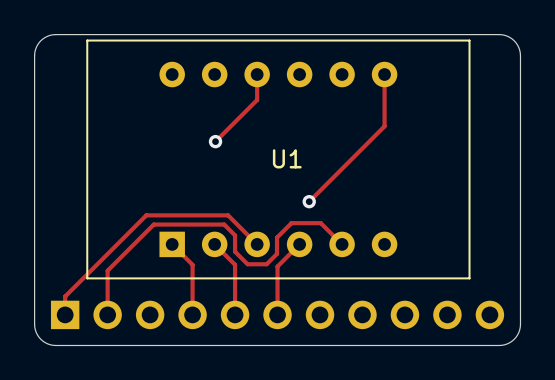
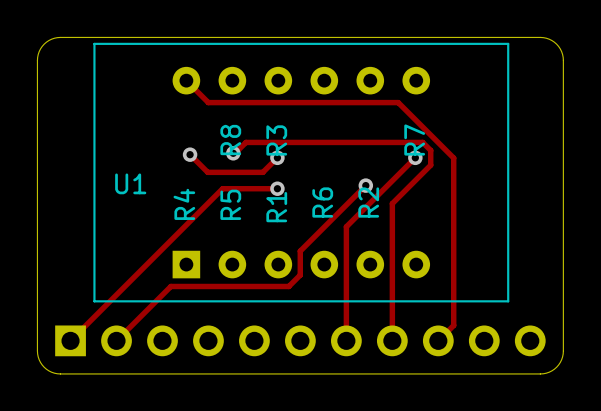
track: none -> (186, 80) (208, 102) (398, 102) (453, 158) (453, 325) (438, 340)
track: (257, 74) (257, 100) (215, 141) -> none
track: (384, 74) (384, 126) (309, 201) -> none
R8: none -> (230, 140)
R3: none -> (276, 140)
R7: none -> (414, 140)
track: none -> (190, 154) (207, 172) (262, 172) (277, 157)
via: none -> (190, 154)
track: none -> (231, 156) (245, 142) (422, 142) (430, 150) (430, 165) (392, 203) (392, 340)
via: none -> (277, 157)
track: none -> (415, 157) (346, 226) (346, 340)
via: none -> (415, 157)
U1 name position: U1 (287, 158) -> U1 (130, 183)
via: none -> (365, 185)
via: none -> (277, 188)
R6: none -> (322, 202)
R2: none -> (368, 202)
R4: none -> (184, 204)
R5: none -> (230, 204)
R1: none -> (276, 207)
via: (309, 201) -> none
track: (172, 244) (192, 264) (192, 314) -> none
track: (214, 244) (235, 264) (235, 314) -> none
track: (257, 244) (228, 215) (146, 215) (65, 296) (65, 314) -> (277, 188) (222, 188) (70, 340)
track: (299, 244) (277, 266) (277, 314) -> none
track: (342, 244) (320, 223) (291, 223) (277, 237) (277, 253) (266, 264) (247, 264) (235, 251) (235, 235) (224, 224) (153, 224) (107, 270) (107, 314) -> (365, 185) (300, 251) (300, 275) (288, 286) (170, 286) (116, 340)

